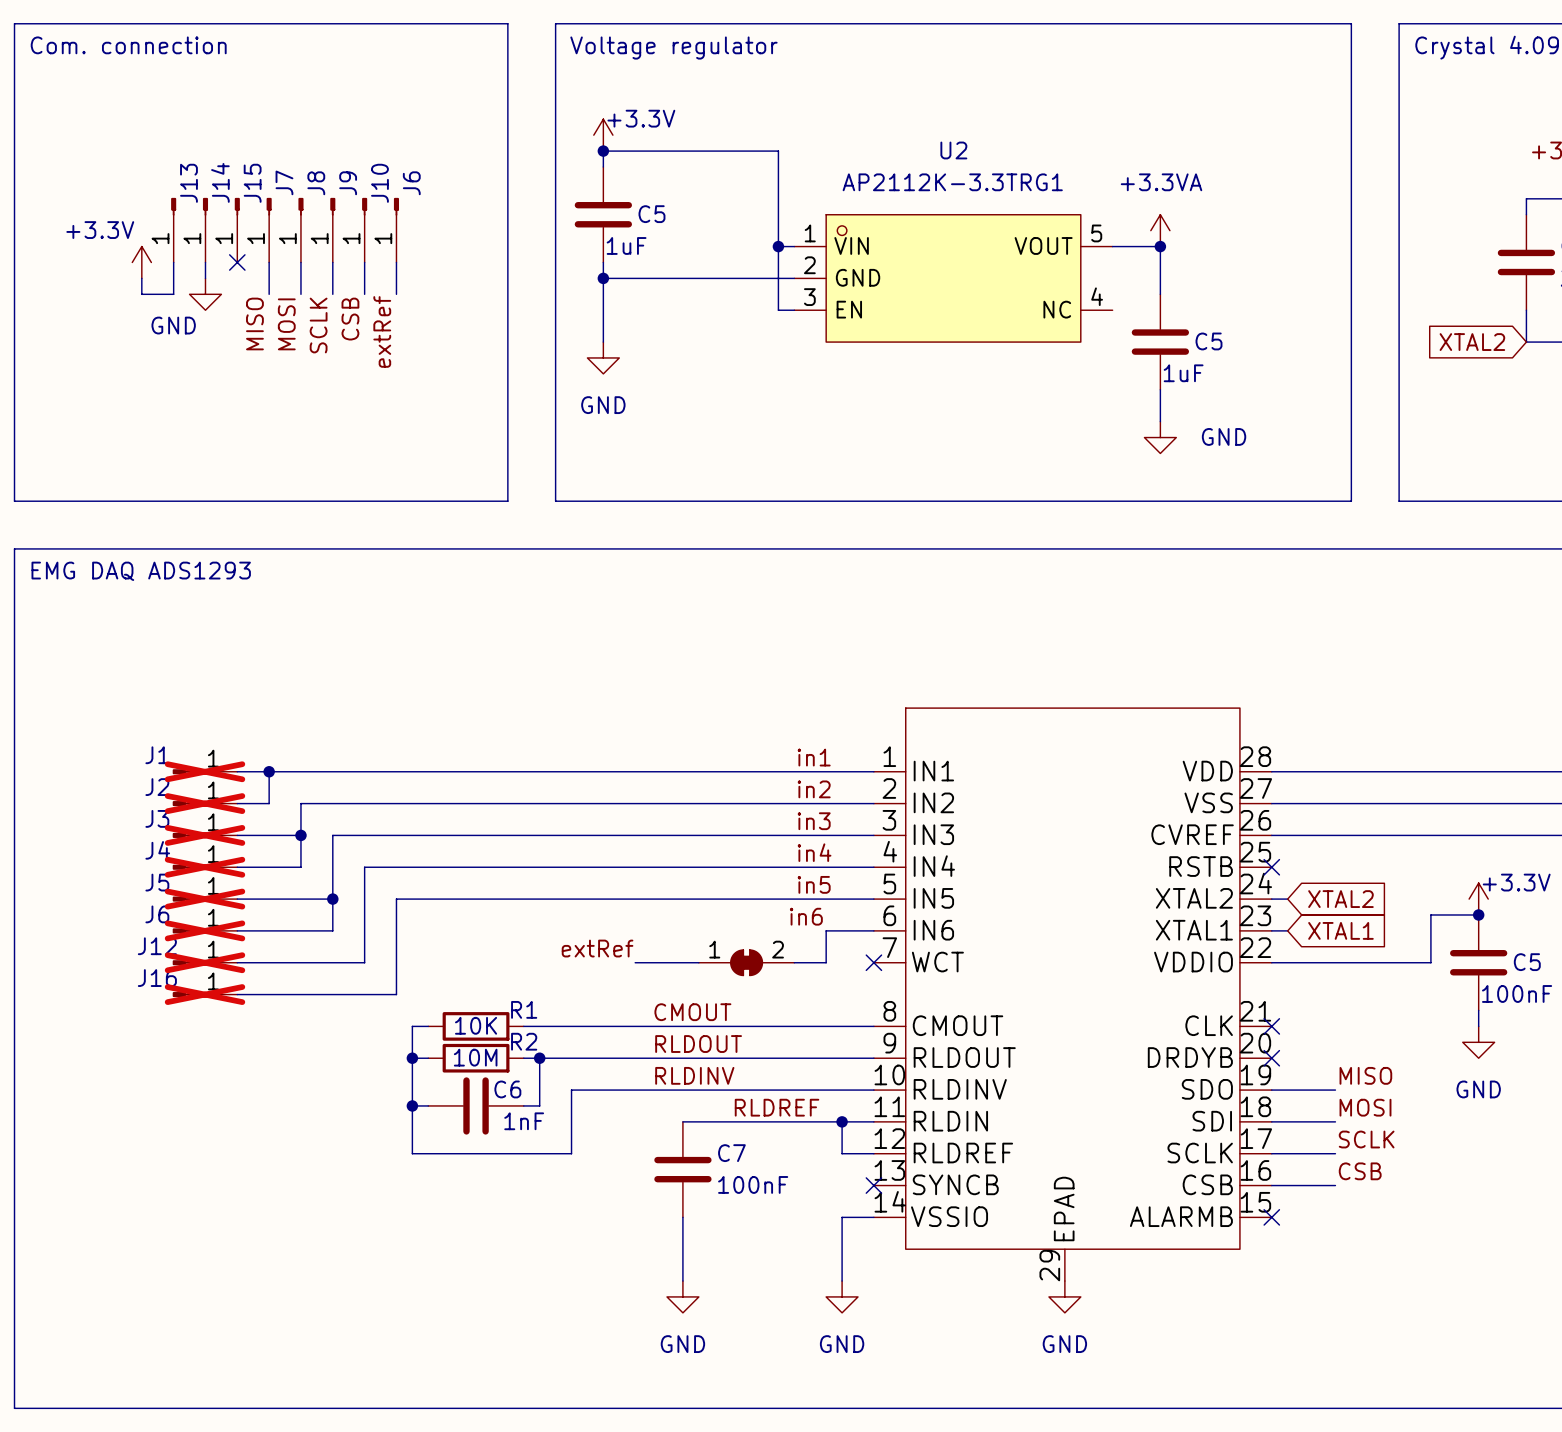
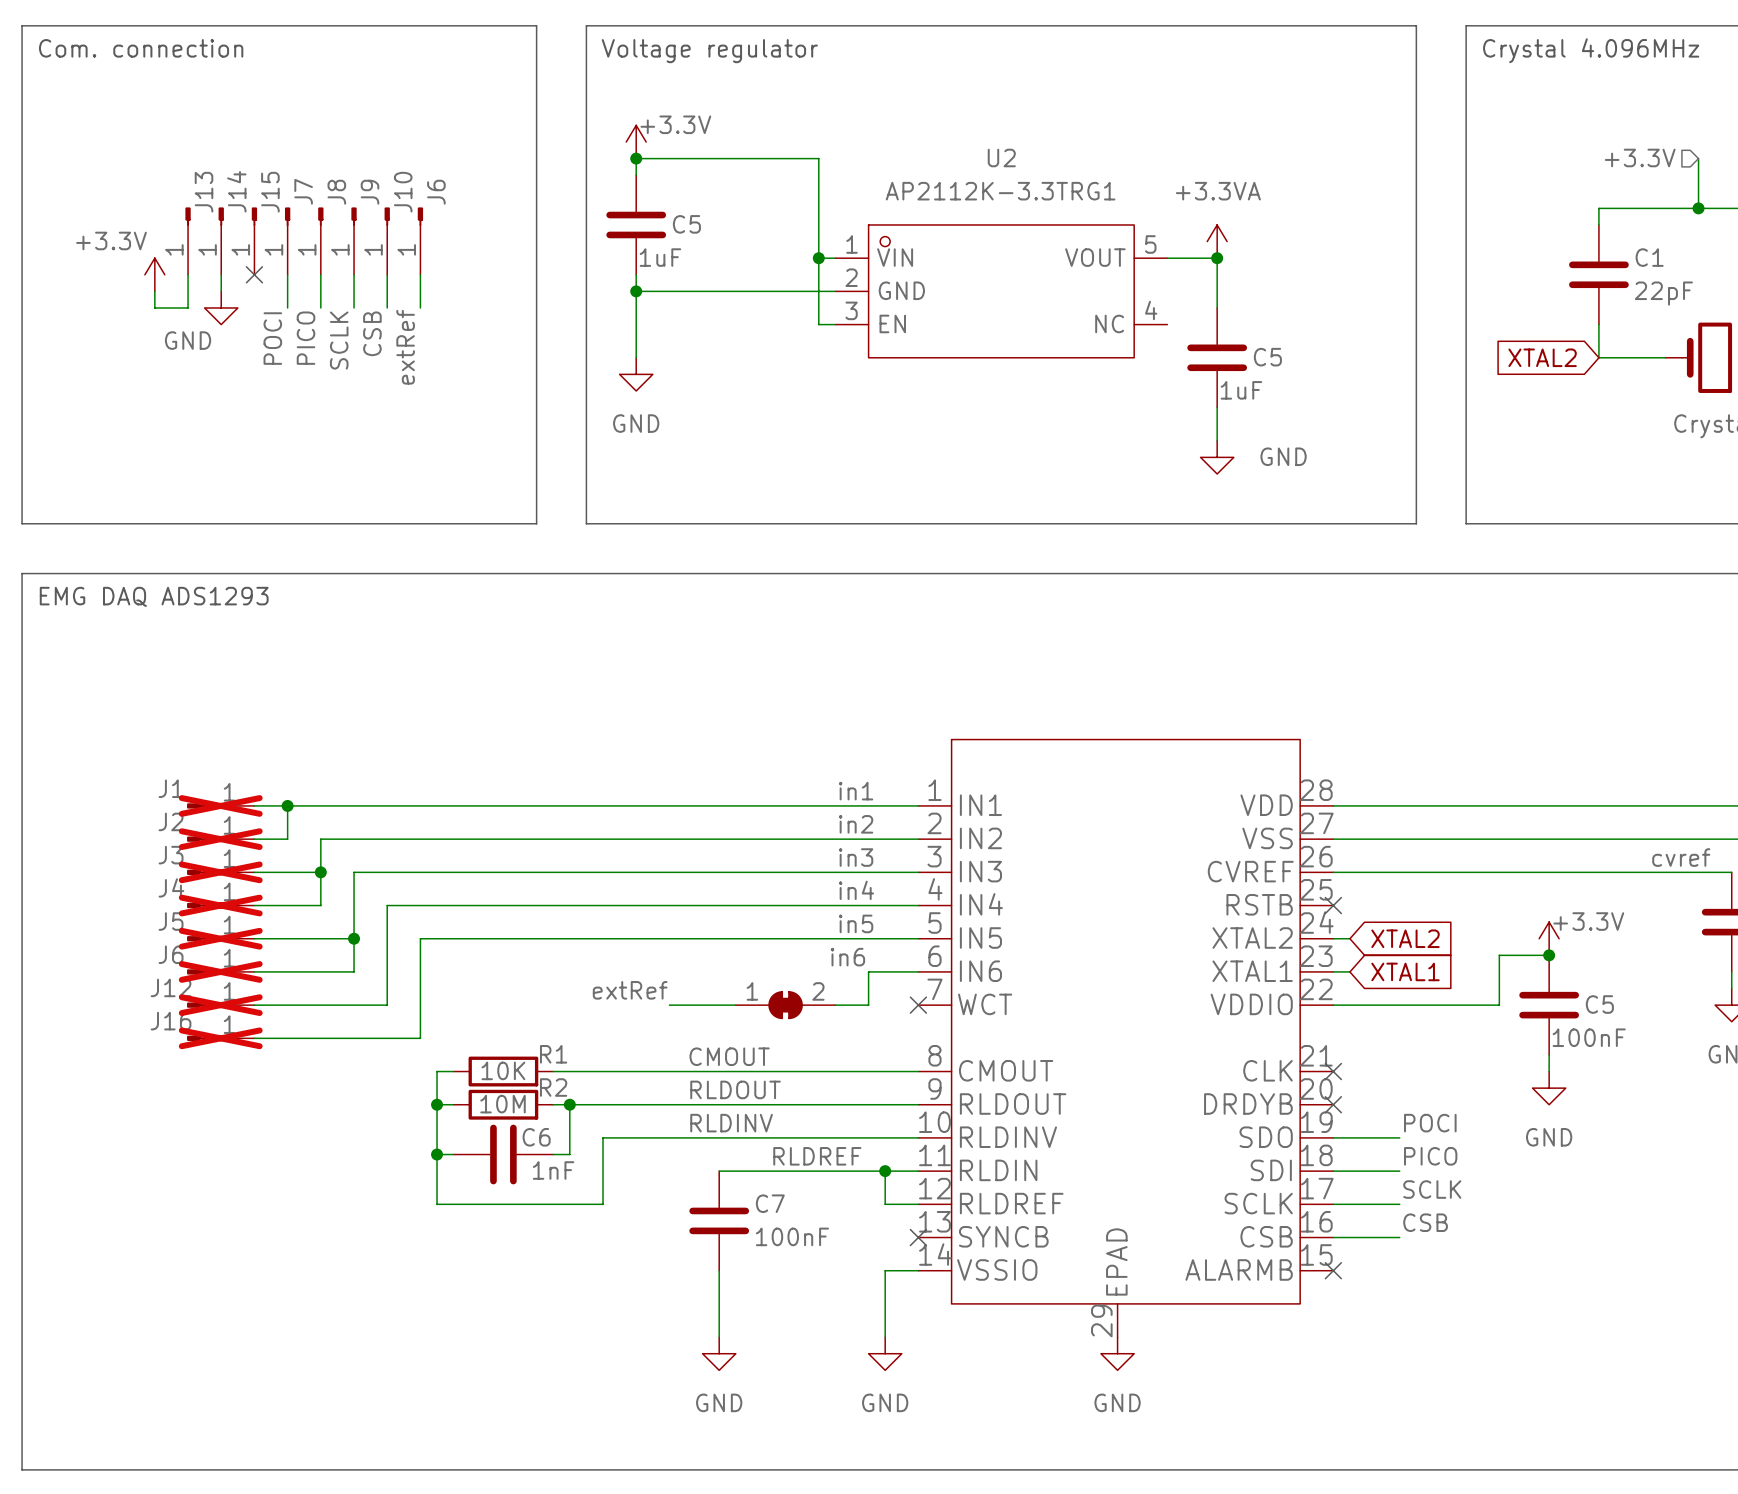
label: MISO (254, 323) -> POCI (272, 338)
label: MOSI (286, 324) -> PICO (306, 338)
label: MISO (1365, 1075) -> POCI (1430, 1123)
label: MOSI (1365, 1107) -> PICO (1430, 1156)

